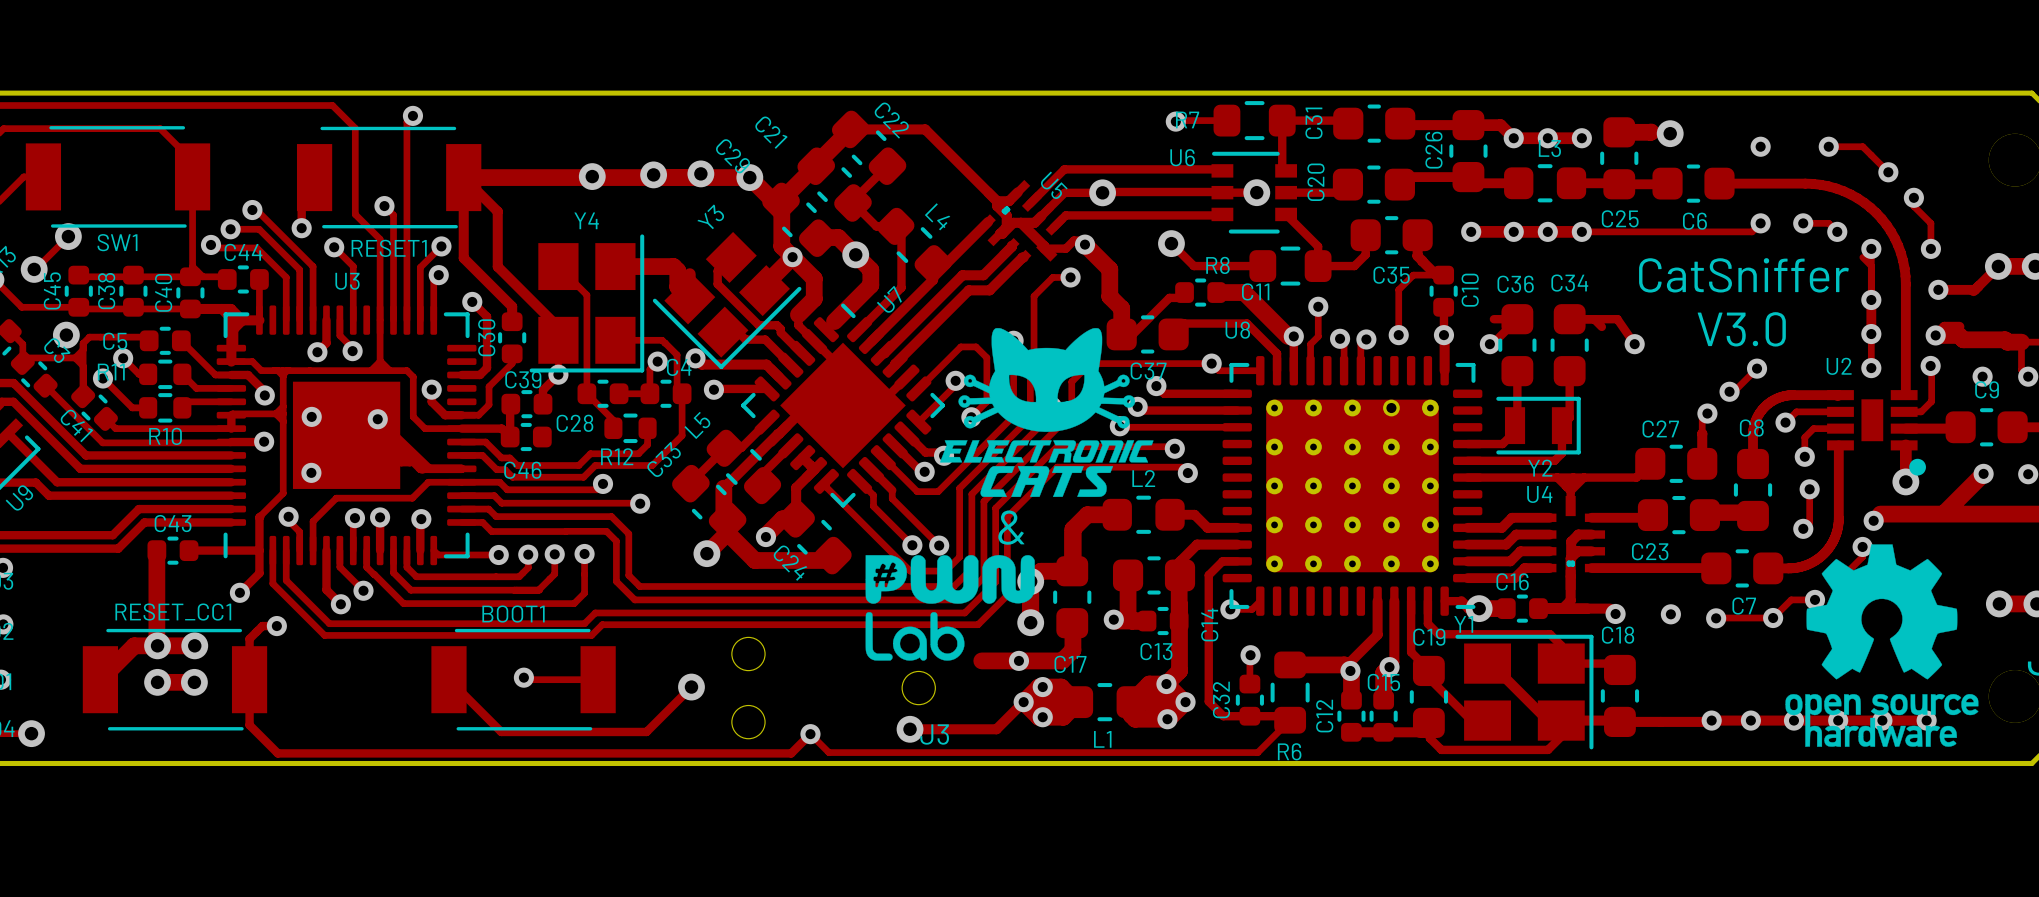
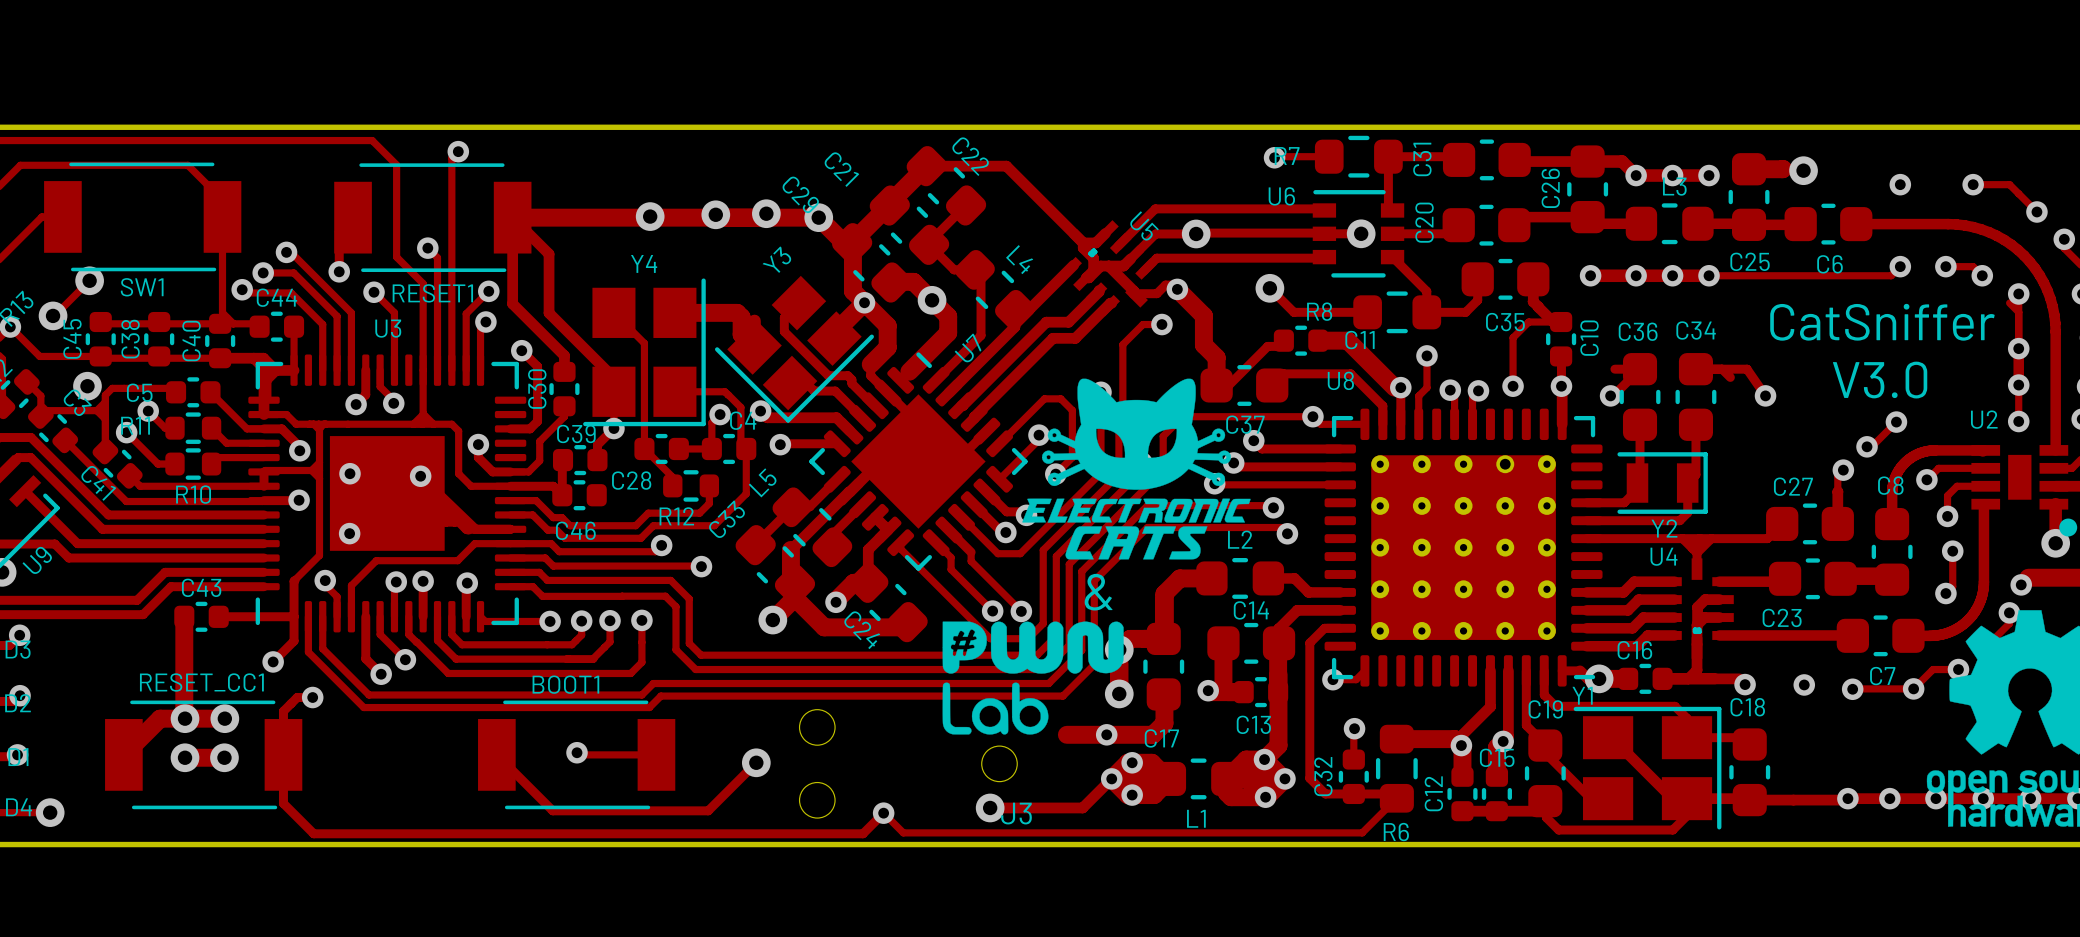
C14 name rotation: 0° (1209, 624) -> 90° clockwise (1251, 610)
C14 name position: C14 (1209, 624) -> C14 (1251, 610)

